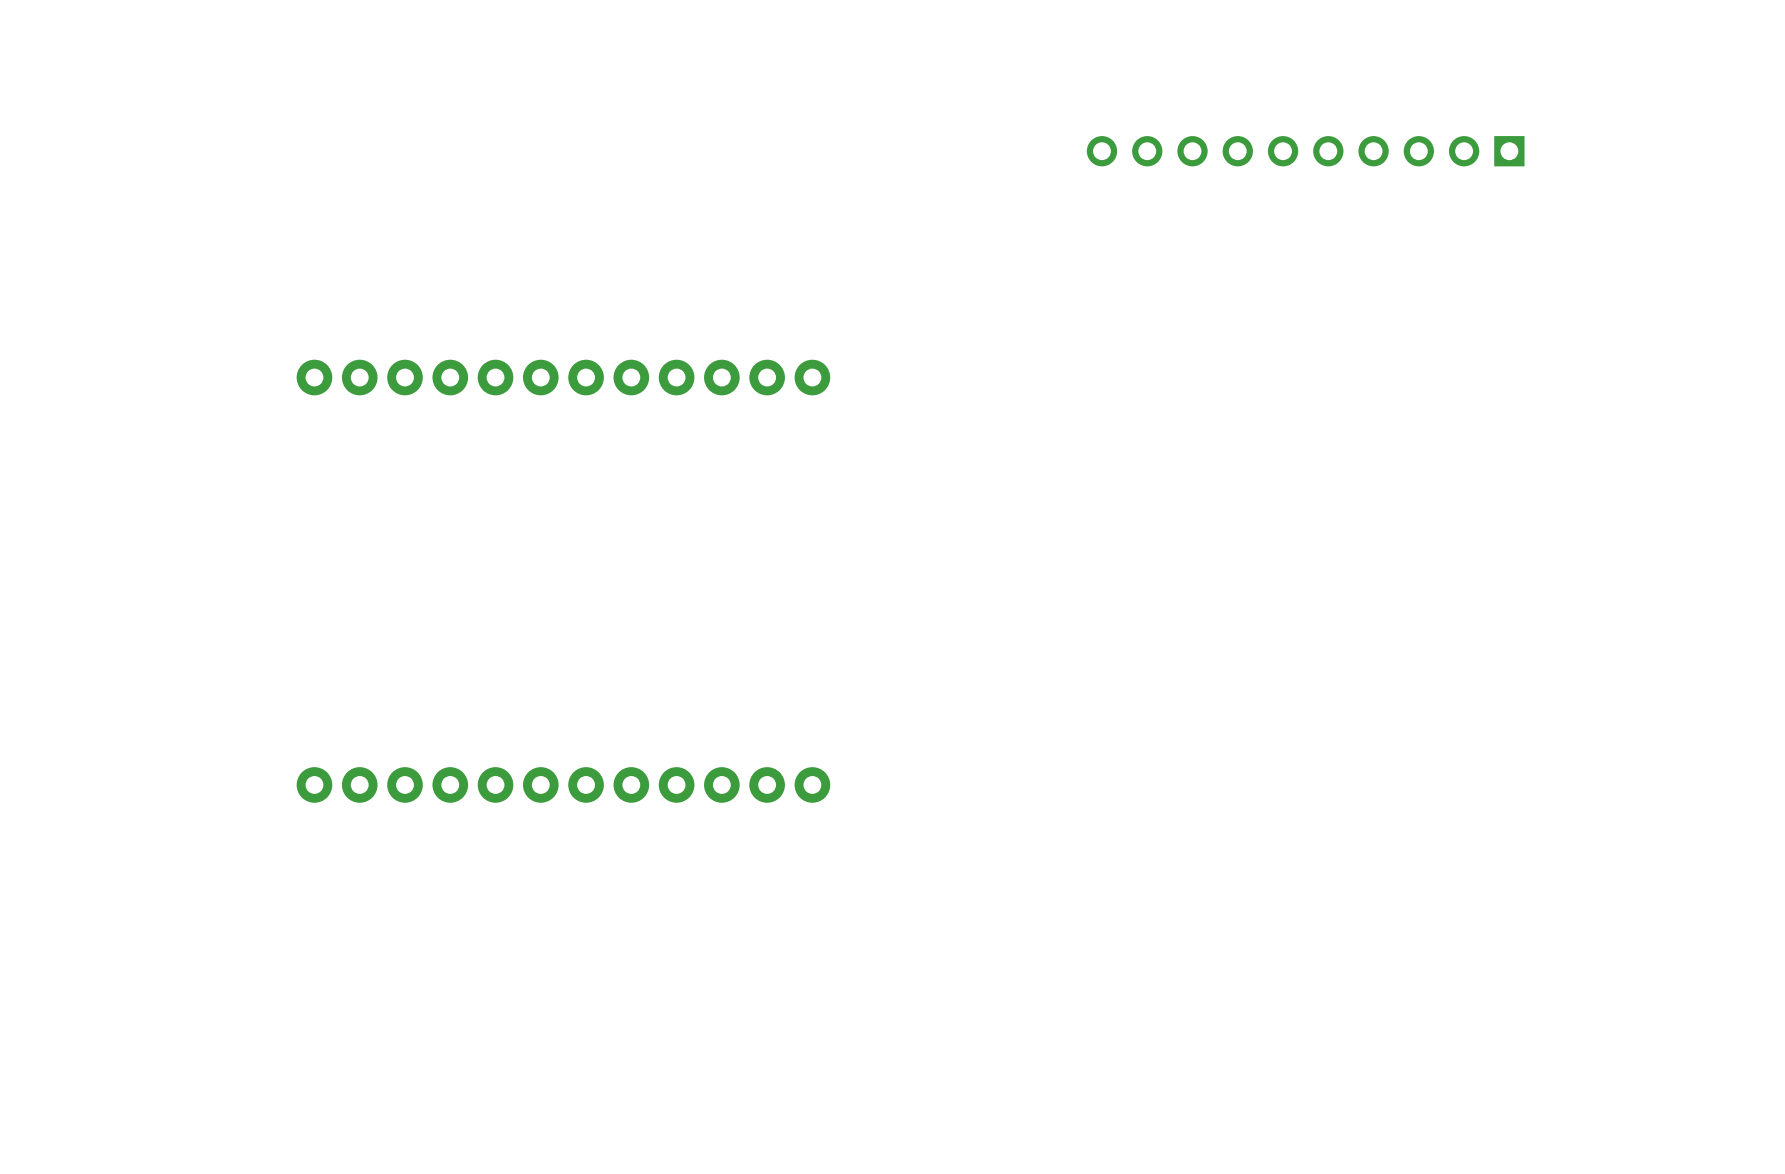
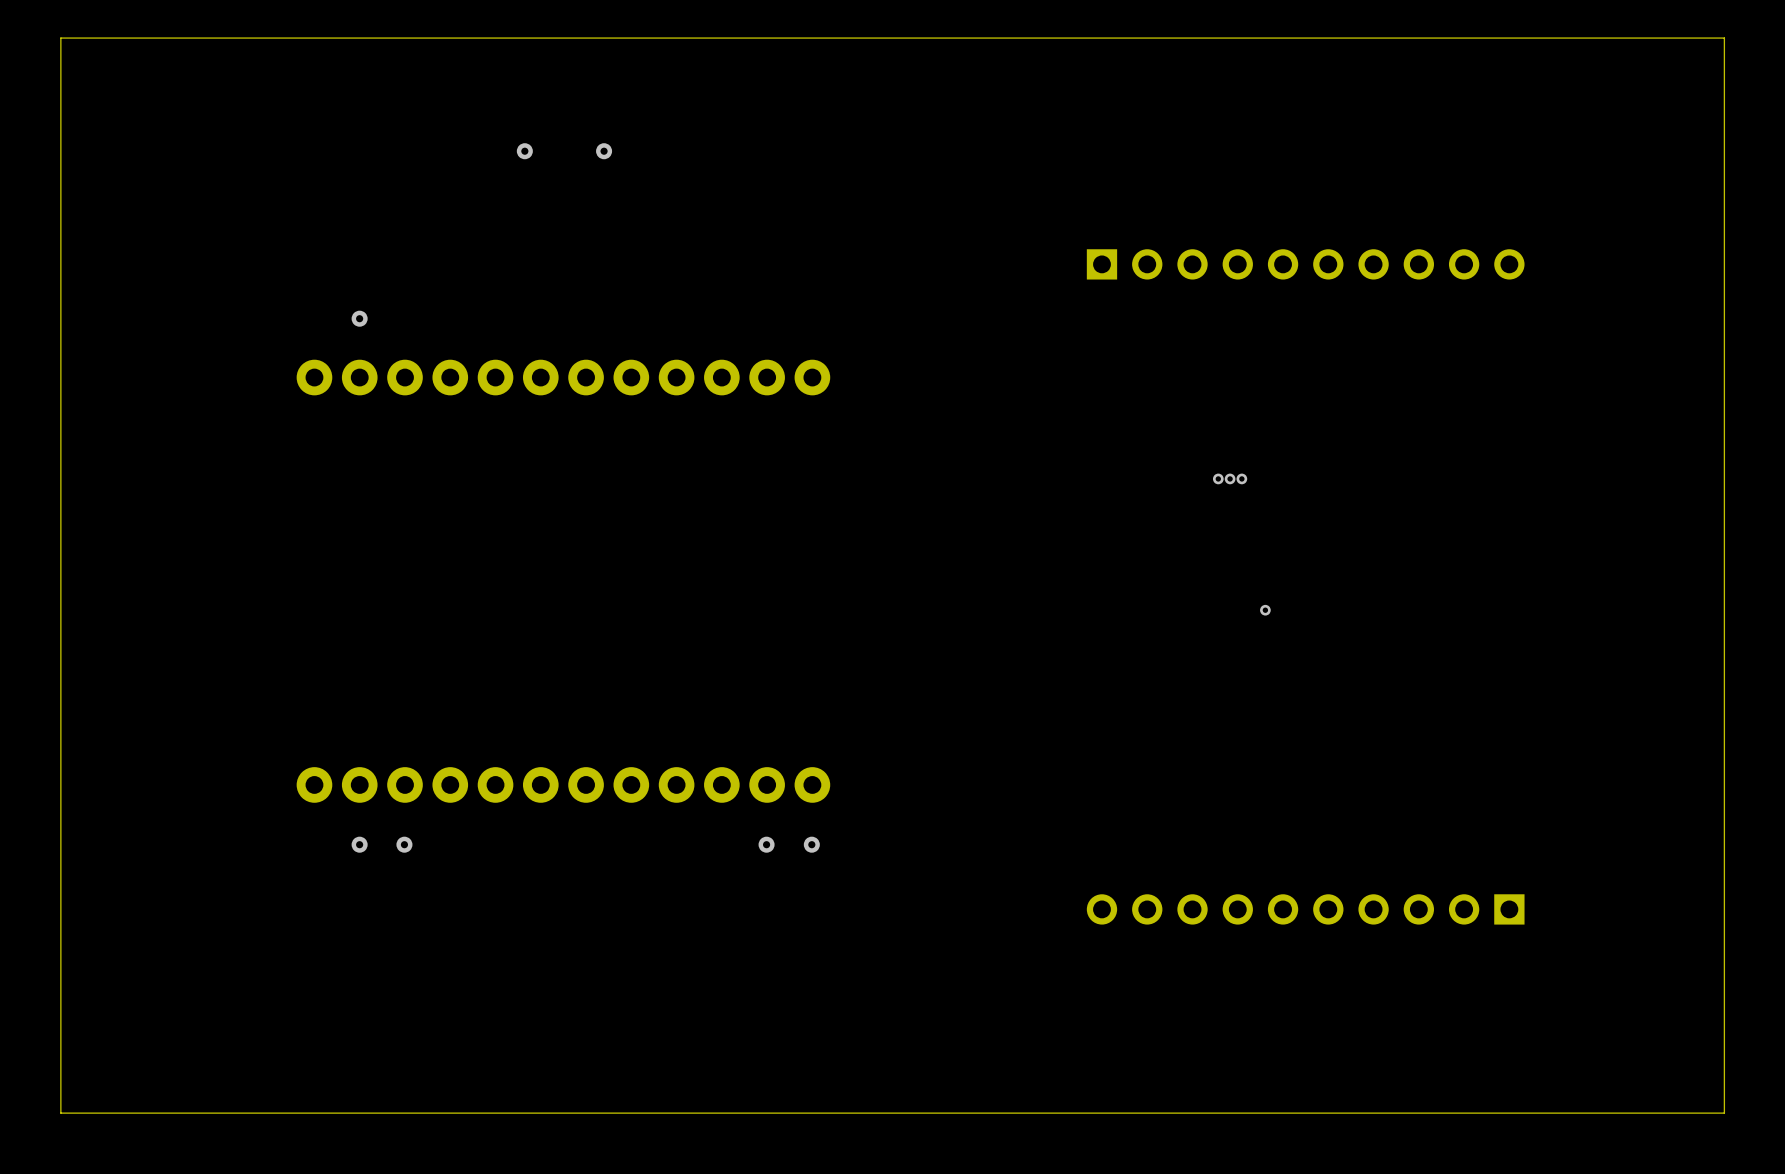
board edge: none -> (1724, 38) (60, 38) (60, 1113) (1724, 1113) (1724, 38)
via: none -> (524, 151)
via: none -> (604, 151)
part rotation: 0° (1305, 151) -> 180° (1305, 264)
via: none -> (359, 318)
via: none -> (1218, 478)
via: none -> (1230, 478)
via: none -> (1241, 478)
via: none -> (1265, 610)
via: none -> (359, 844)
via: none -> (404, 844)
via: none -> (766, 844)
via: none -> (811, 844)
part: none -> (1305, 909)

